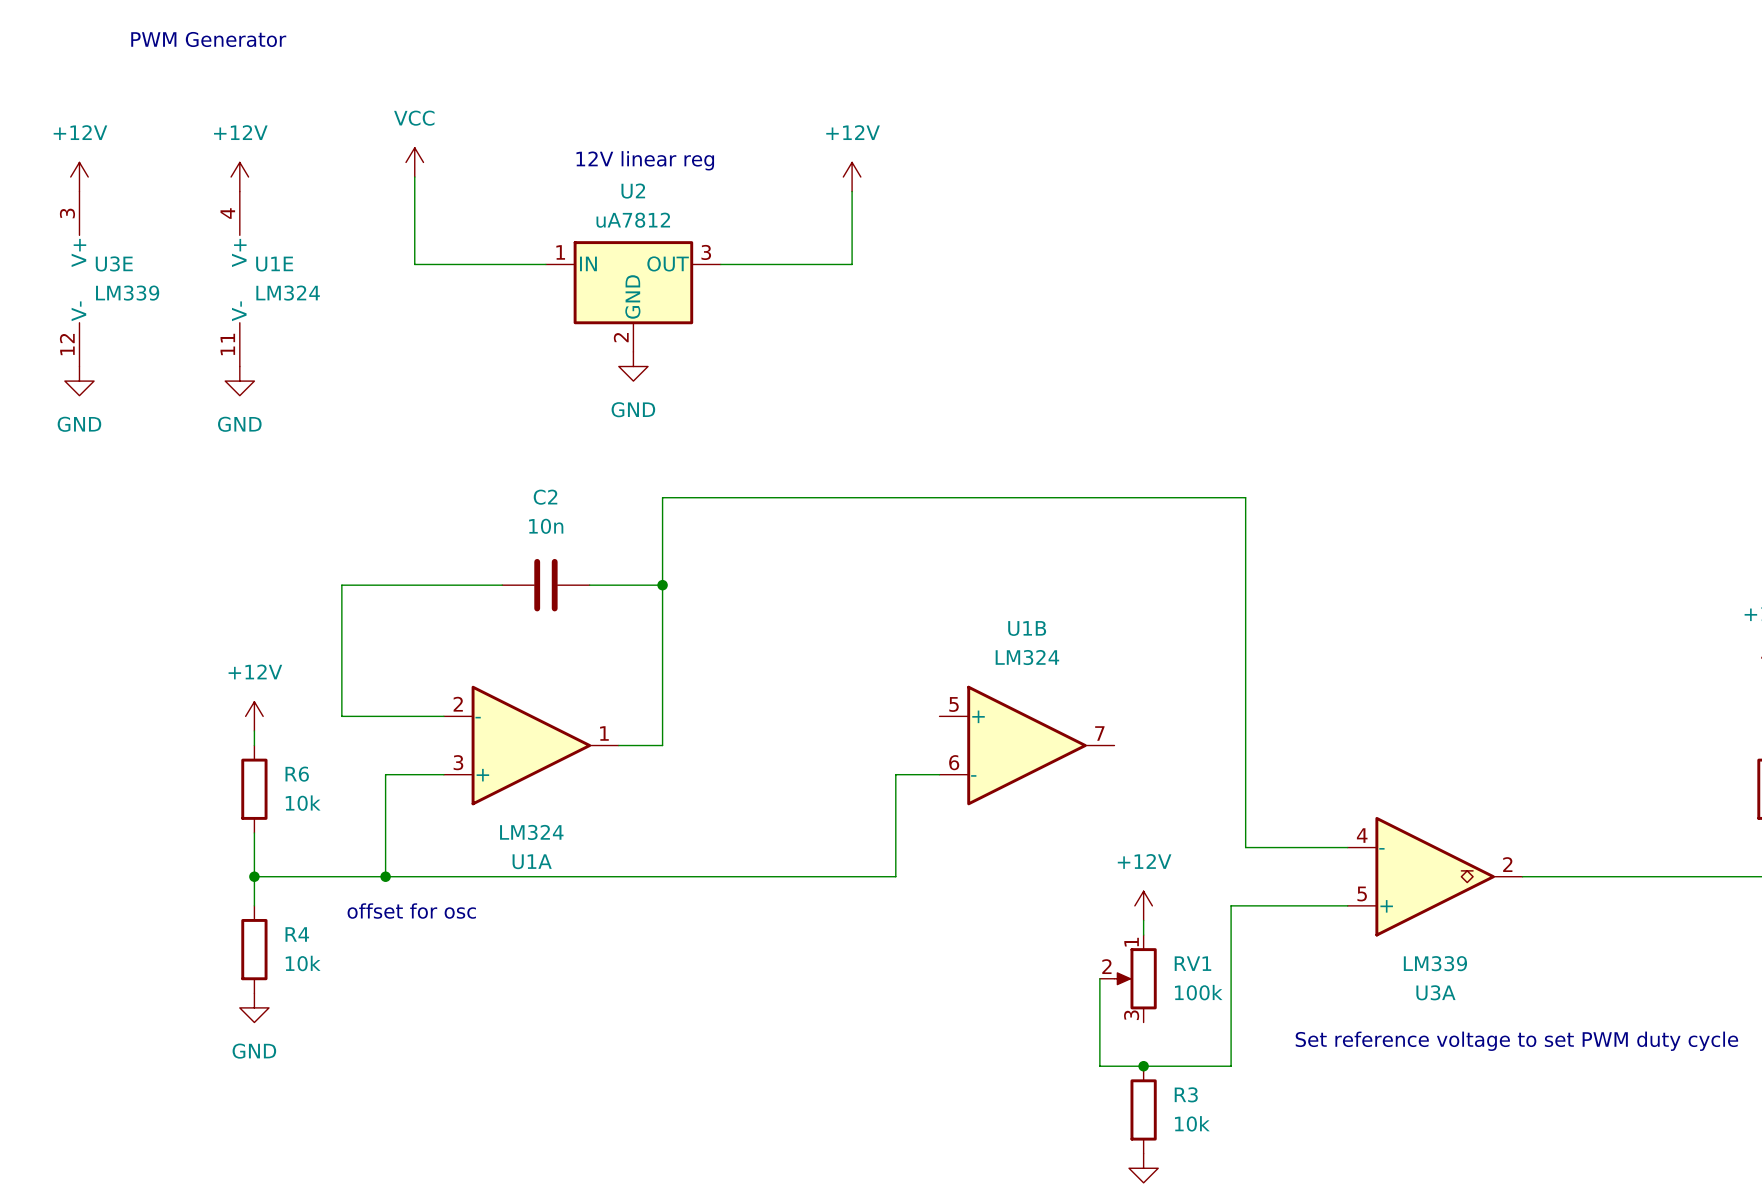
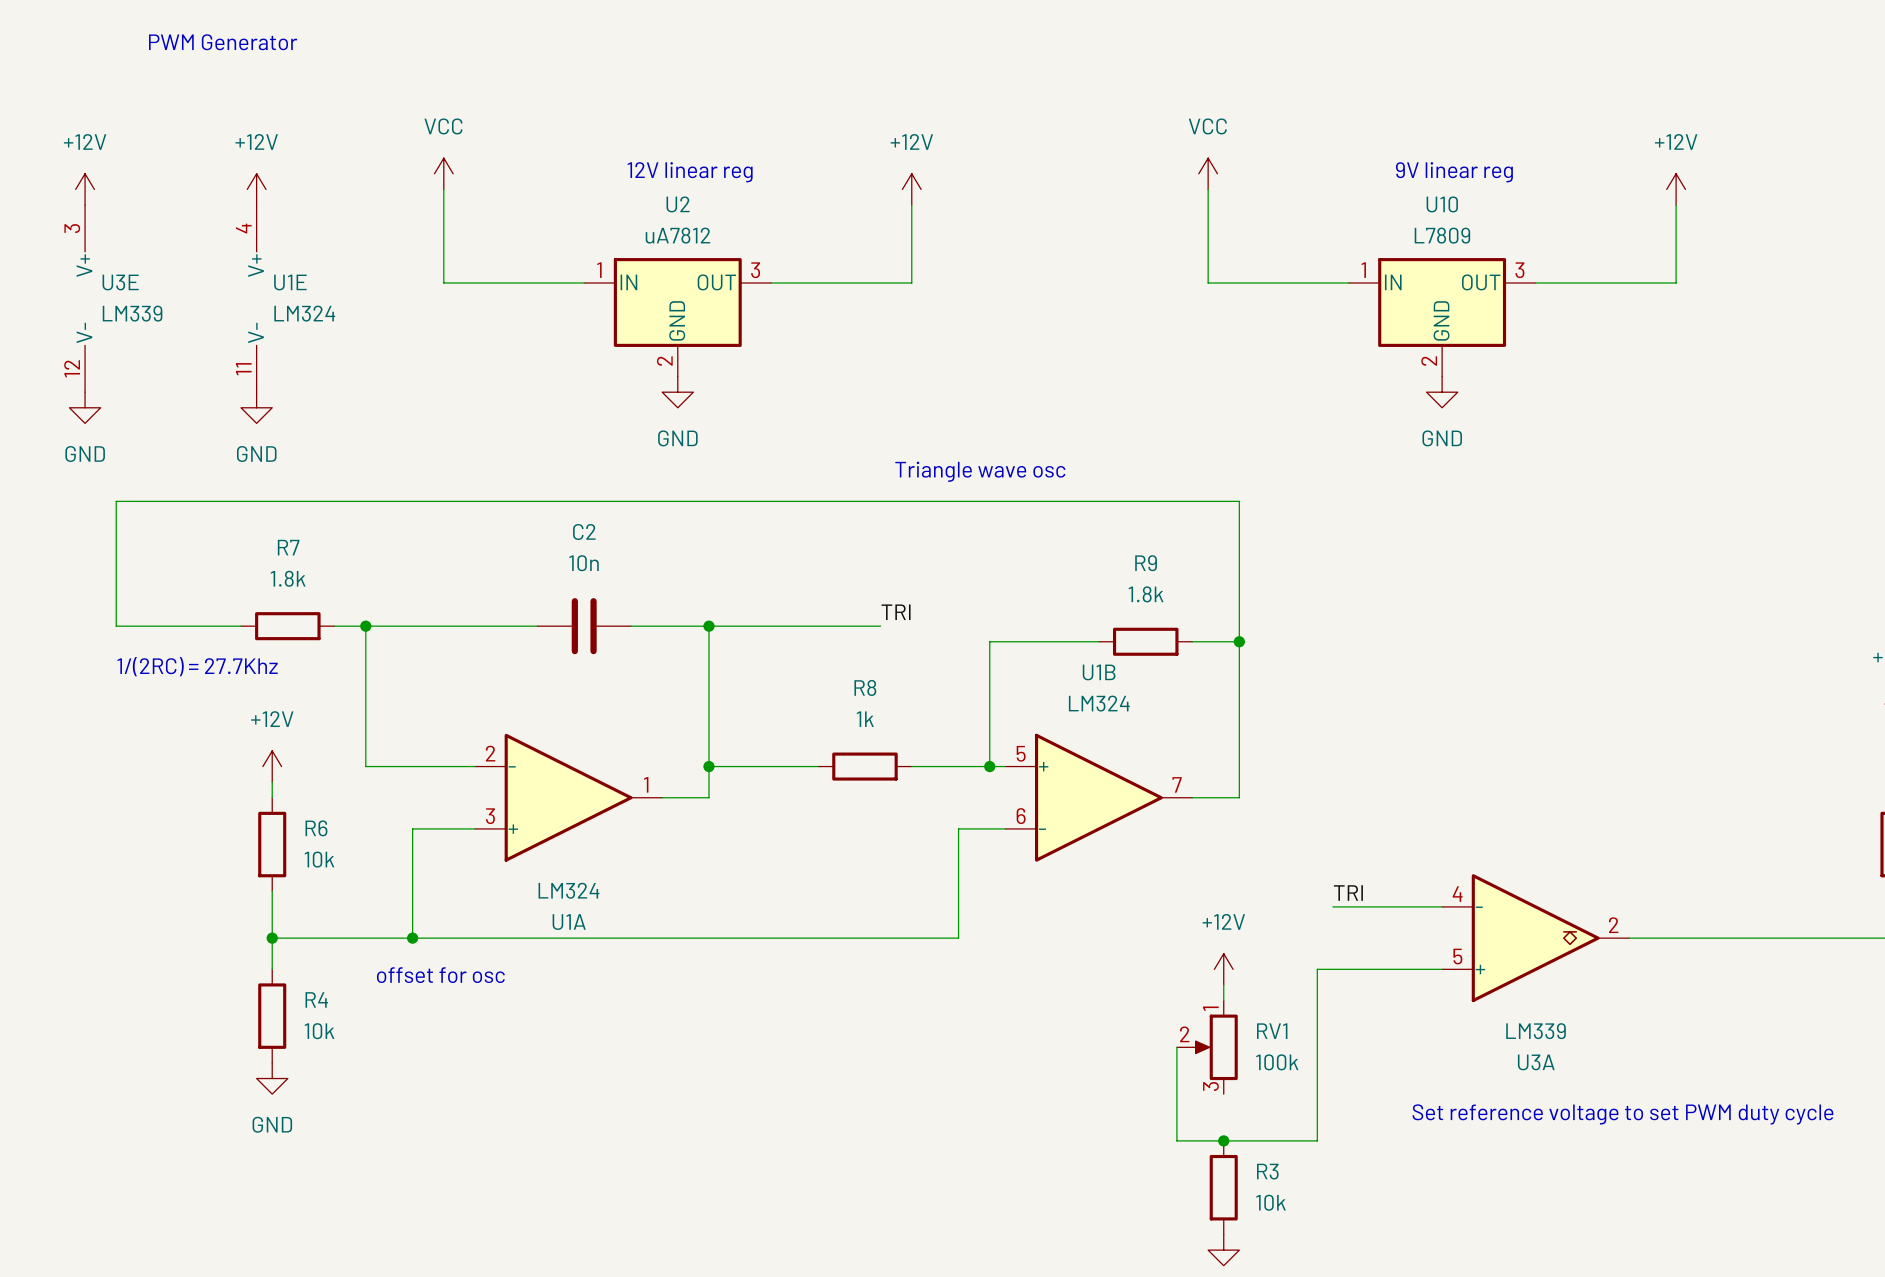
text: none -> 9V linear reg (1454, 172)
power symbol: none -> VCC (1208, 173)
wire: none -> (1208, 189) (1208, 283) (1348, 283)
power symbol: none -> +12V (1676, 189)
wire: none -> (1676, 205) (1676, 283) (1535, 283)
U10: none -> L7809 (1442, 317)
power symbol: none -> GND (1442, 392)
text: none -> Triangle wave osc (980, 471)
label: none -> TRI (896, 612)
wire: none -> (241, 626) (116, 626) (116, 501) (1239, 501) (1239, 797) (1192, 797)
R7: none -> 1.8k (287, 626)
wire: none -> (334, 626) (365, 626)
junction: none -> (365, 626)
wire: (662, 585) (662, 497) (1245, 497) (1245, 847) -> (708, 626) (880, 626)
wire: none -> (1098, 641) (989, 641) (989, 766)
R9: none -> 1.8k (1145, 641)
wire: none -> (1192, 641) (1239, 641)
junction: none -> (1239, 641)
text: none -> 1/(2RC) = 27.7Khz (197, 666)
wire: none -> (708, 766) (818, 766)
junction: none -> (708, 766)
R8: none -> 1k (864, 766)
wire: none -> (911, 766) (1005, 766)
junction: none -> (989, 766)
label: none -> TRI (1348, 893)

